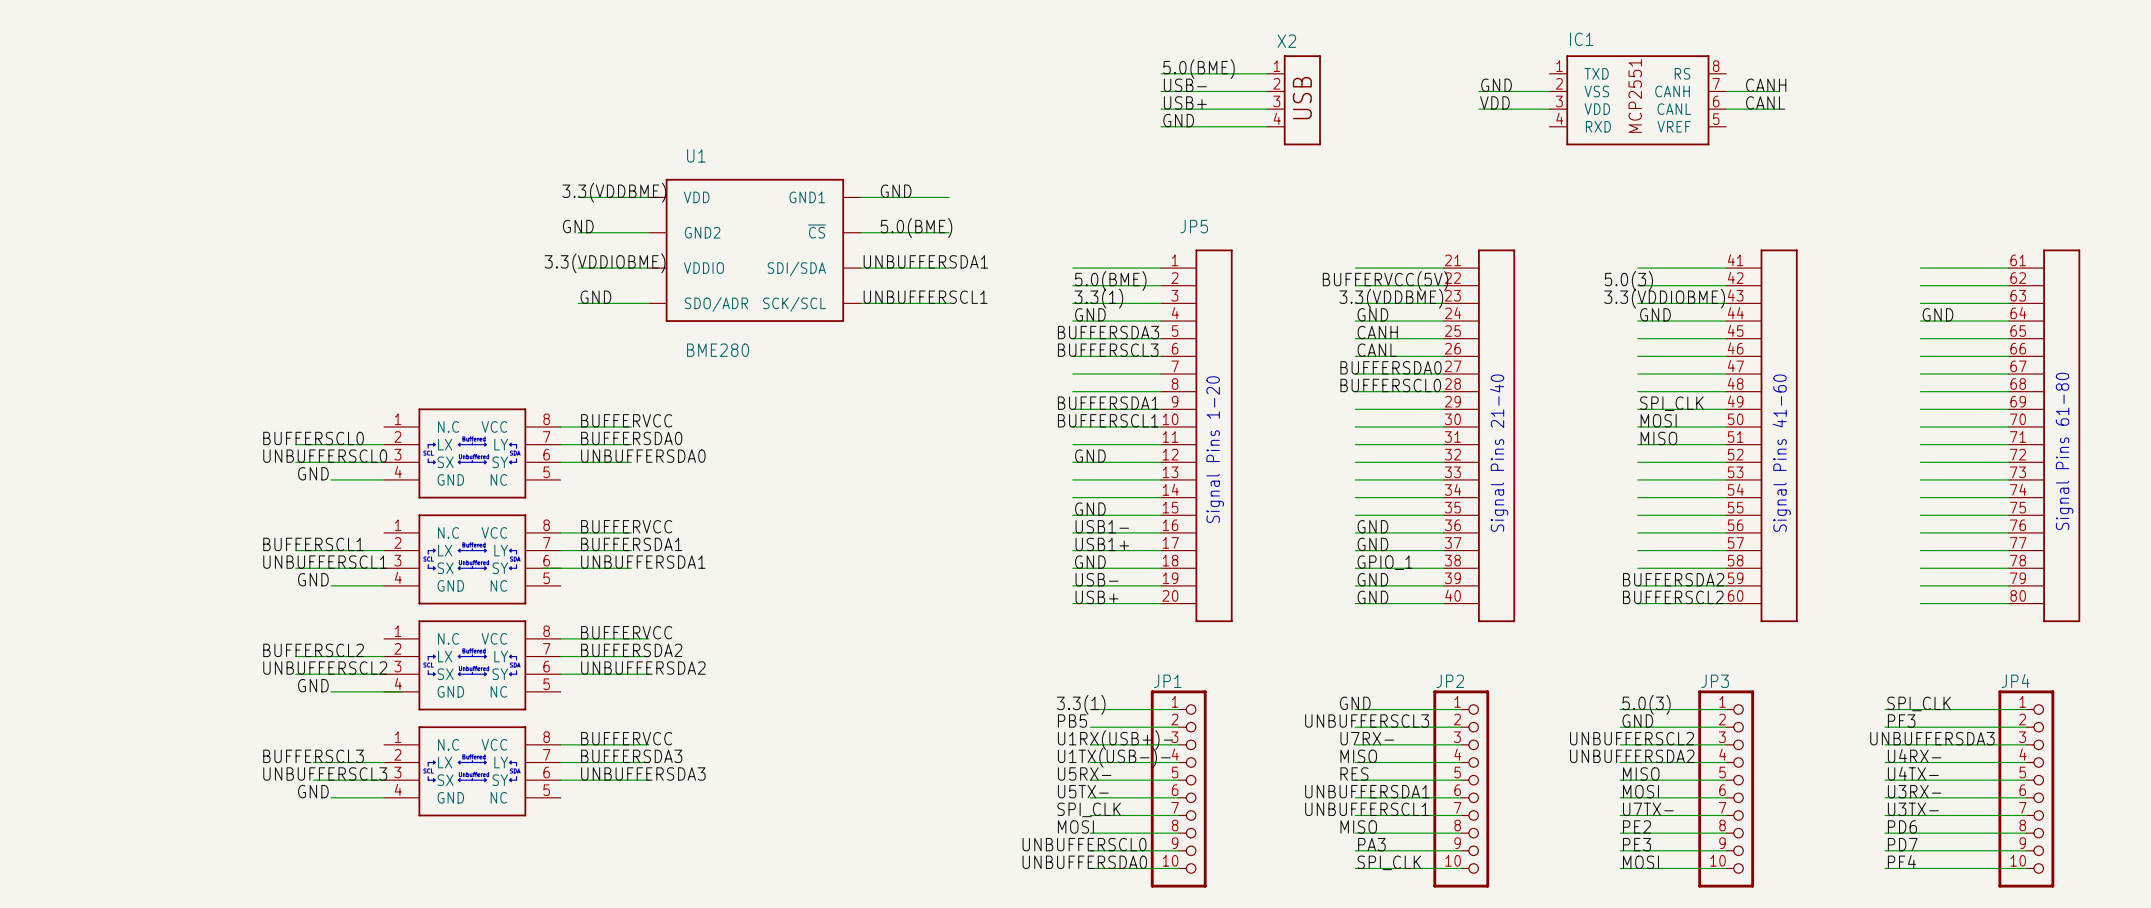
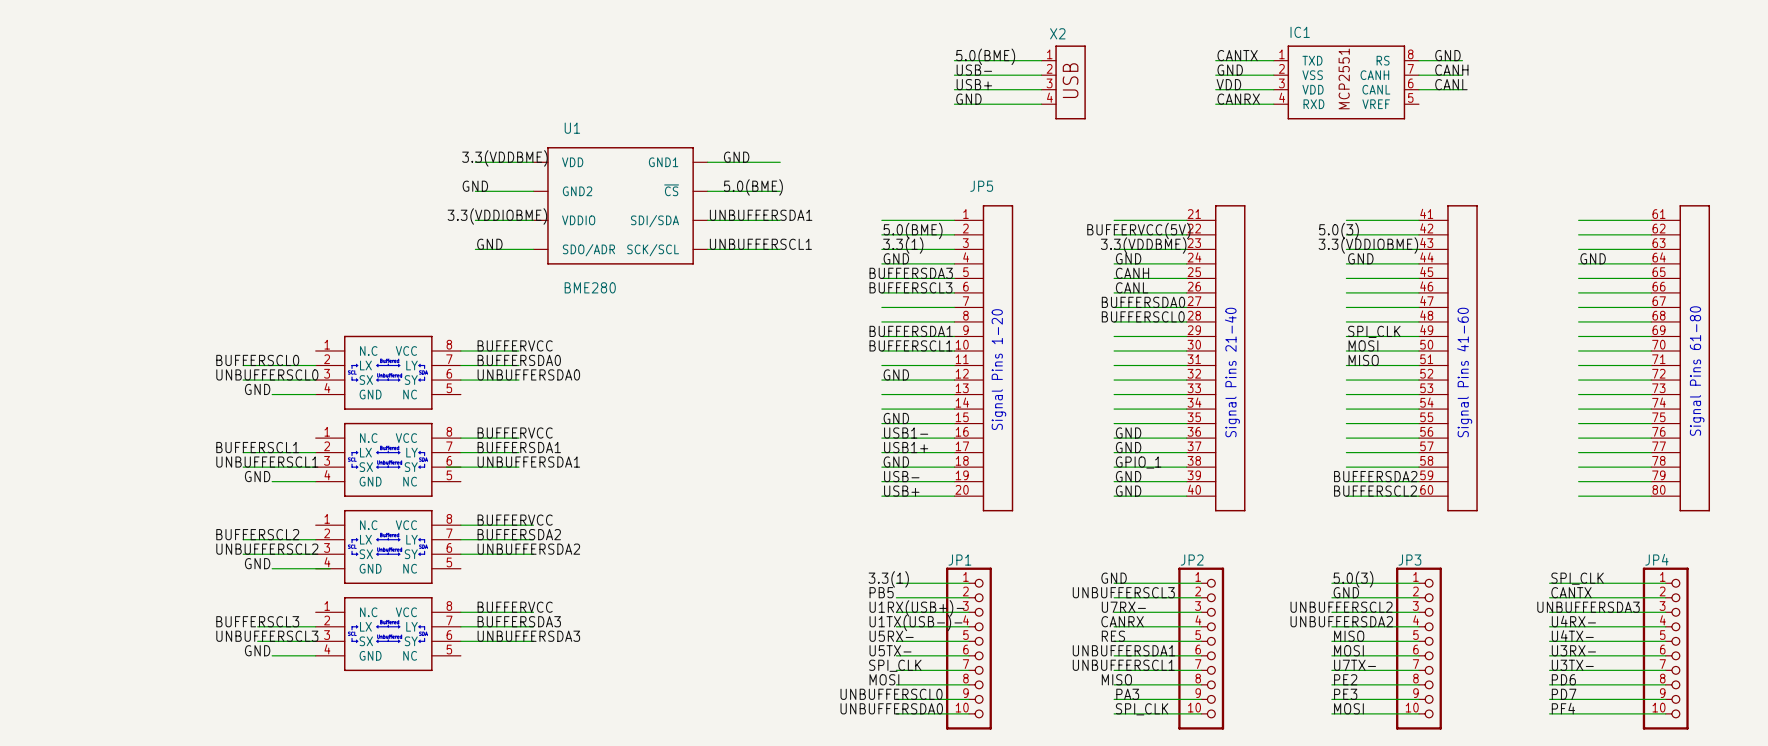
label: none -> CANTX (1237, 55)
label: none -> GND (1447, 55)
wire: none -> (1215, 60) (1273, 60)
wire: none -> (1418, 60) (1462, 60)
label: none -> CANRX (1238, 99)
wire: none -> (1215, 104) (1273, 104)
label: PF3 (1901, 721) -> CANTX (1571, 592)
label: MISO (1358, 756) -> CANRX (1122, 621)

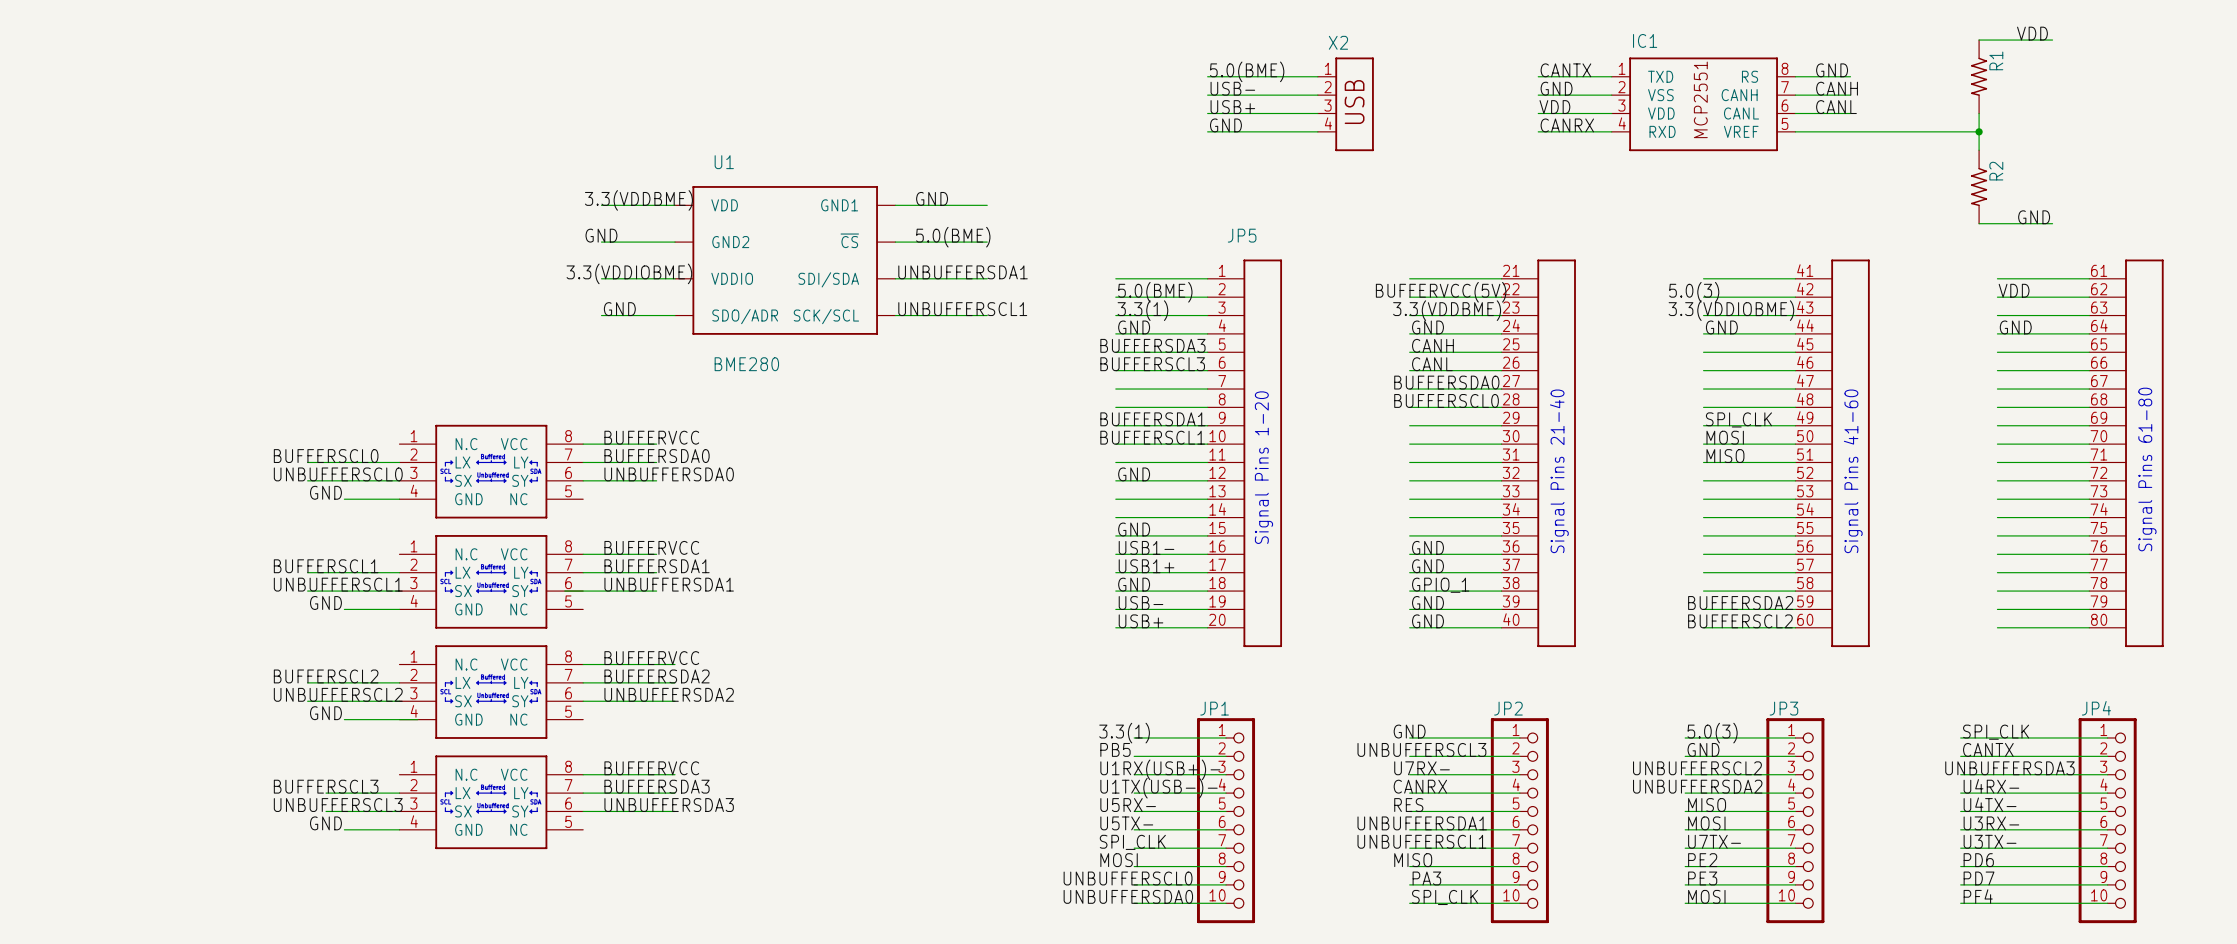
label: none -> VDD (2032, 33)
wire: none -> (1979, 40) (2052, 40)
R1: none -> (1979, 76)
wire: none -> (1979, 113) (1979, 150)
wire: none -> (1795, 131) (1979, 131)
junction: none -> (1979, 131)
R2: none -> (1979, 186)
label: none -> GND (2034, 217)
wire: none -> (1979, 223) (2052, 223)
label: none -> VDD (2014, 290)

